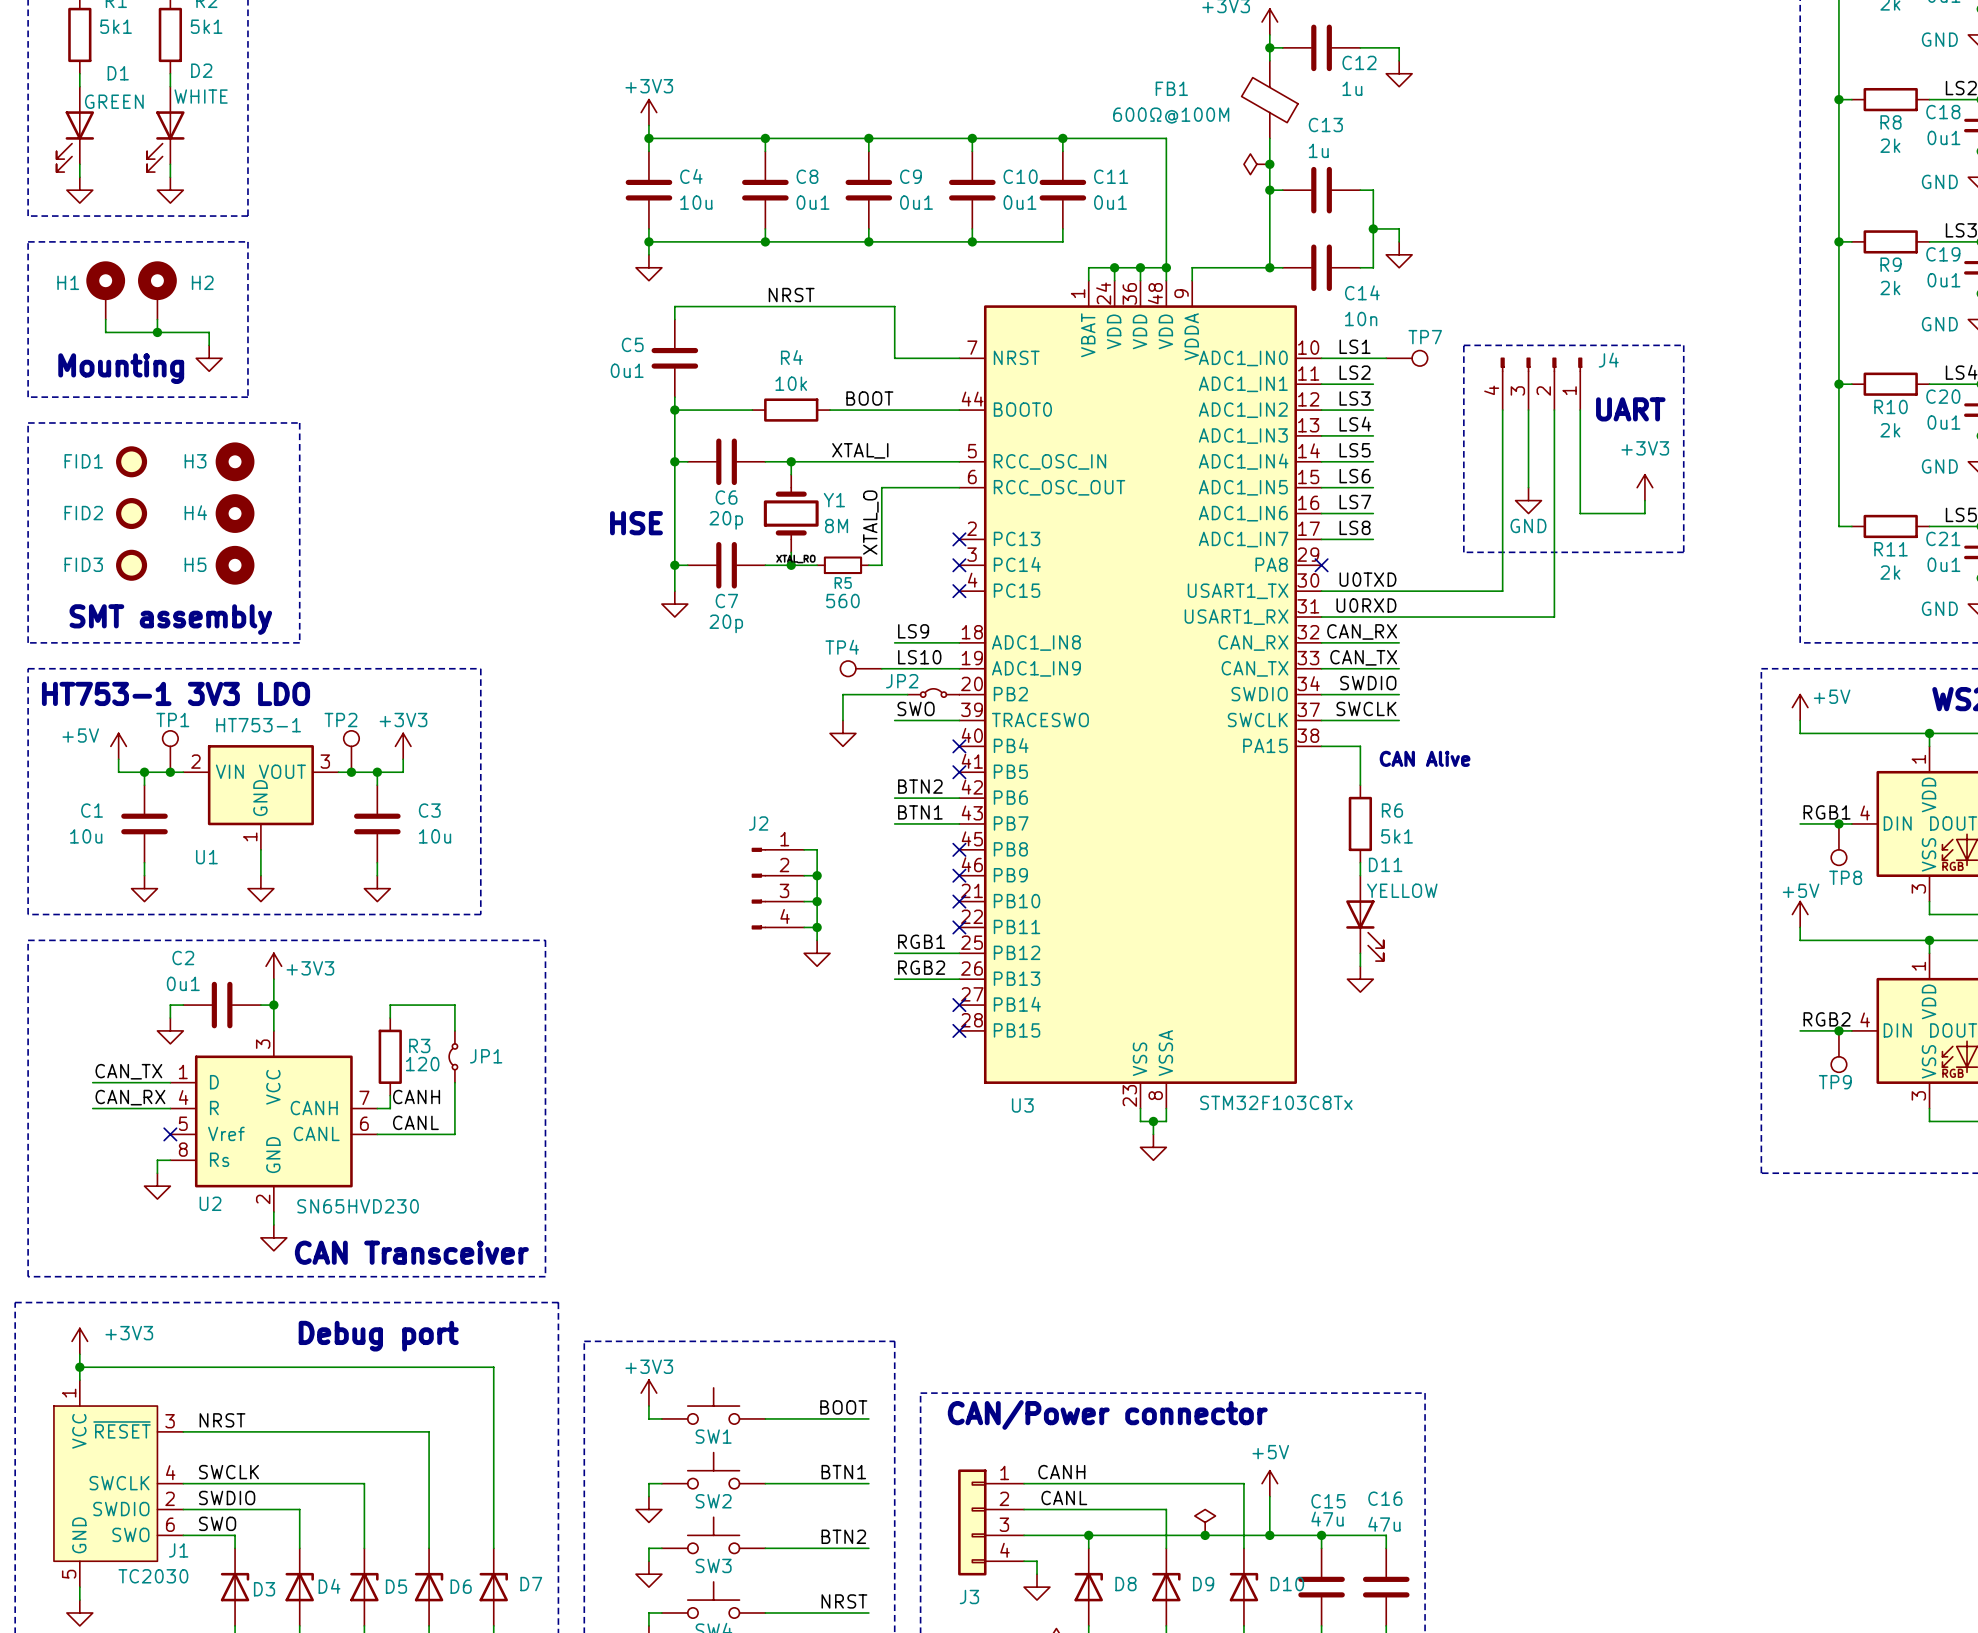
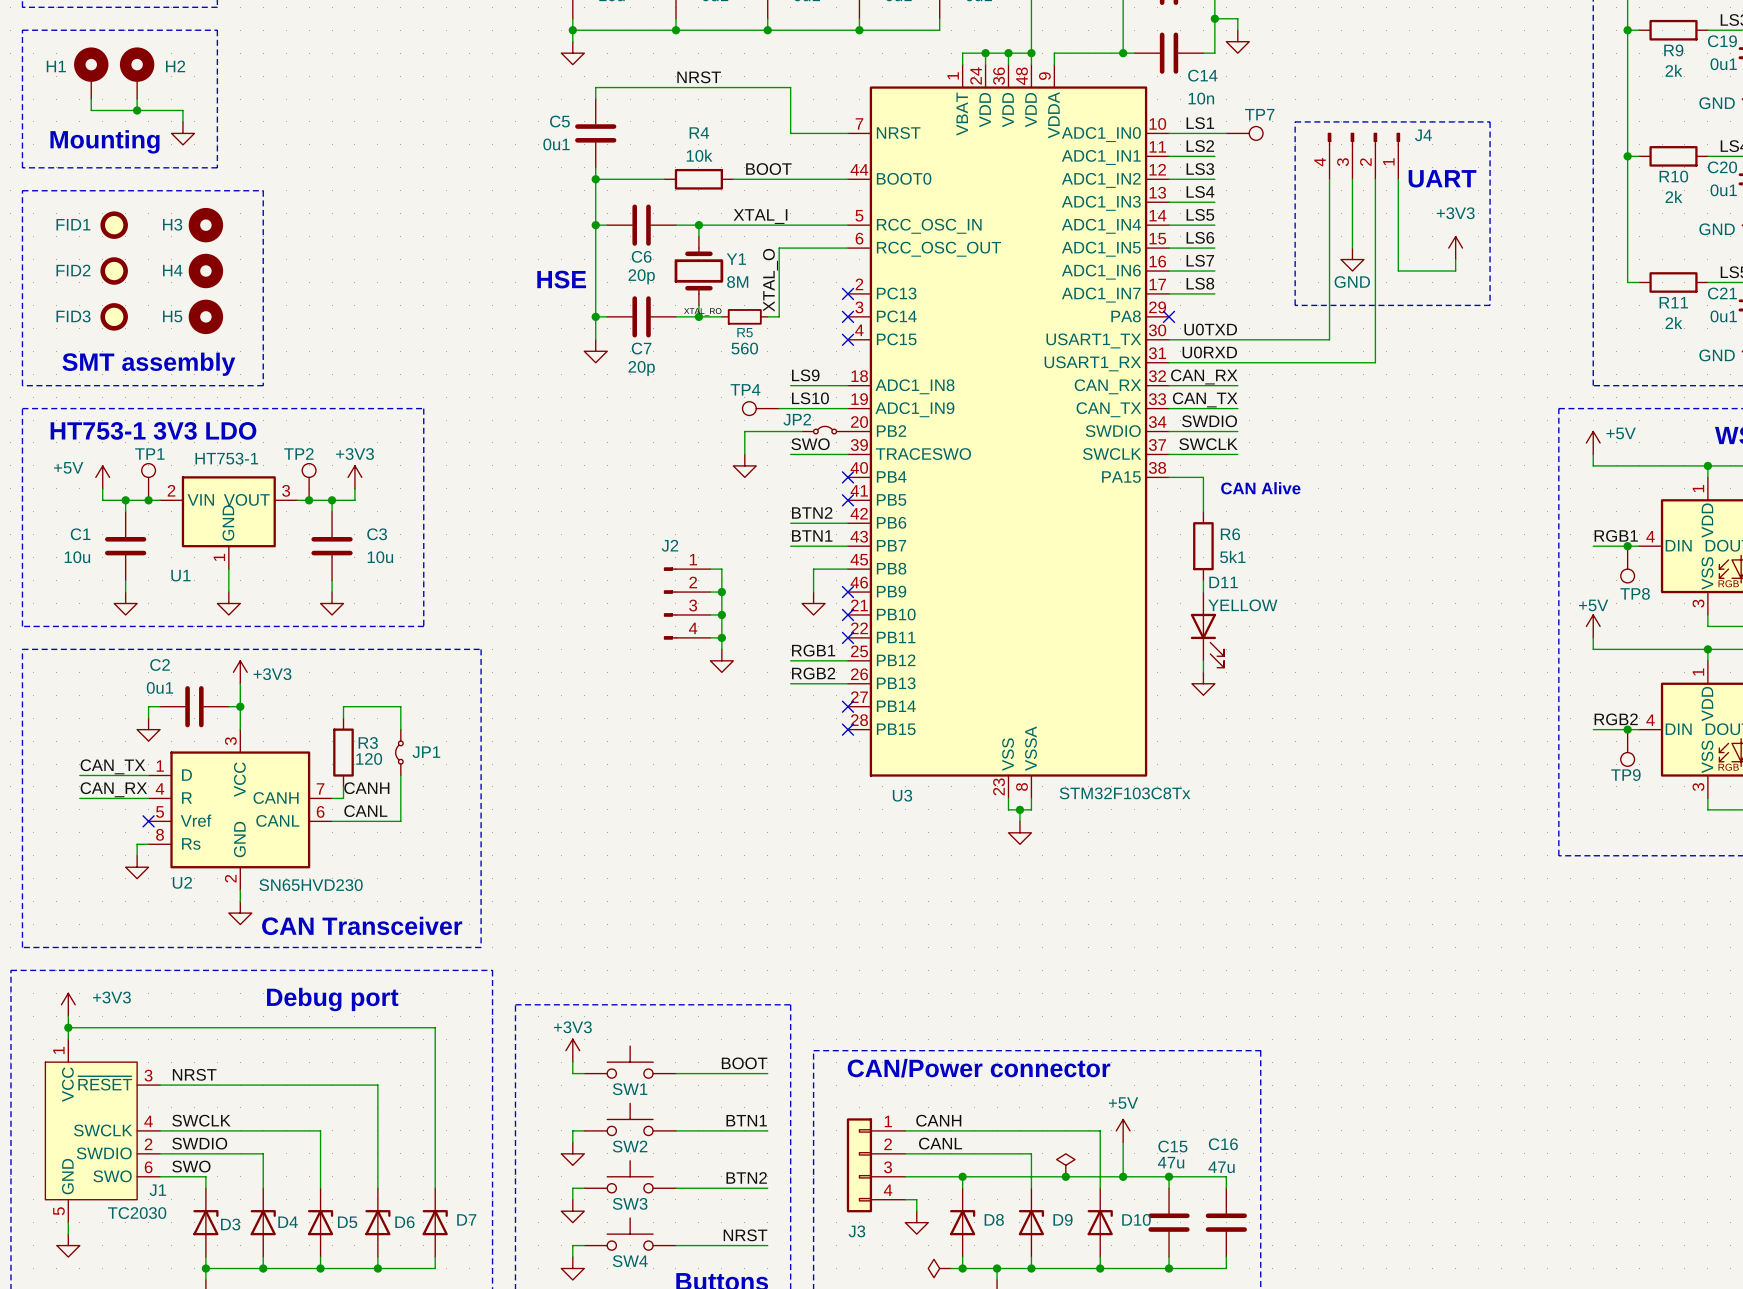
wire: none -> (847, 569) (813, 569) (813, 592)
no-connect mark: (959, 849) -> none
power symbol: none -> (813, 603)

